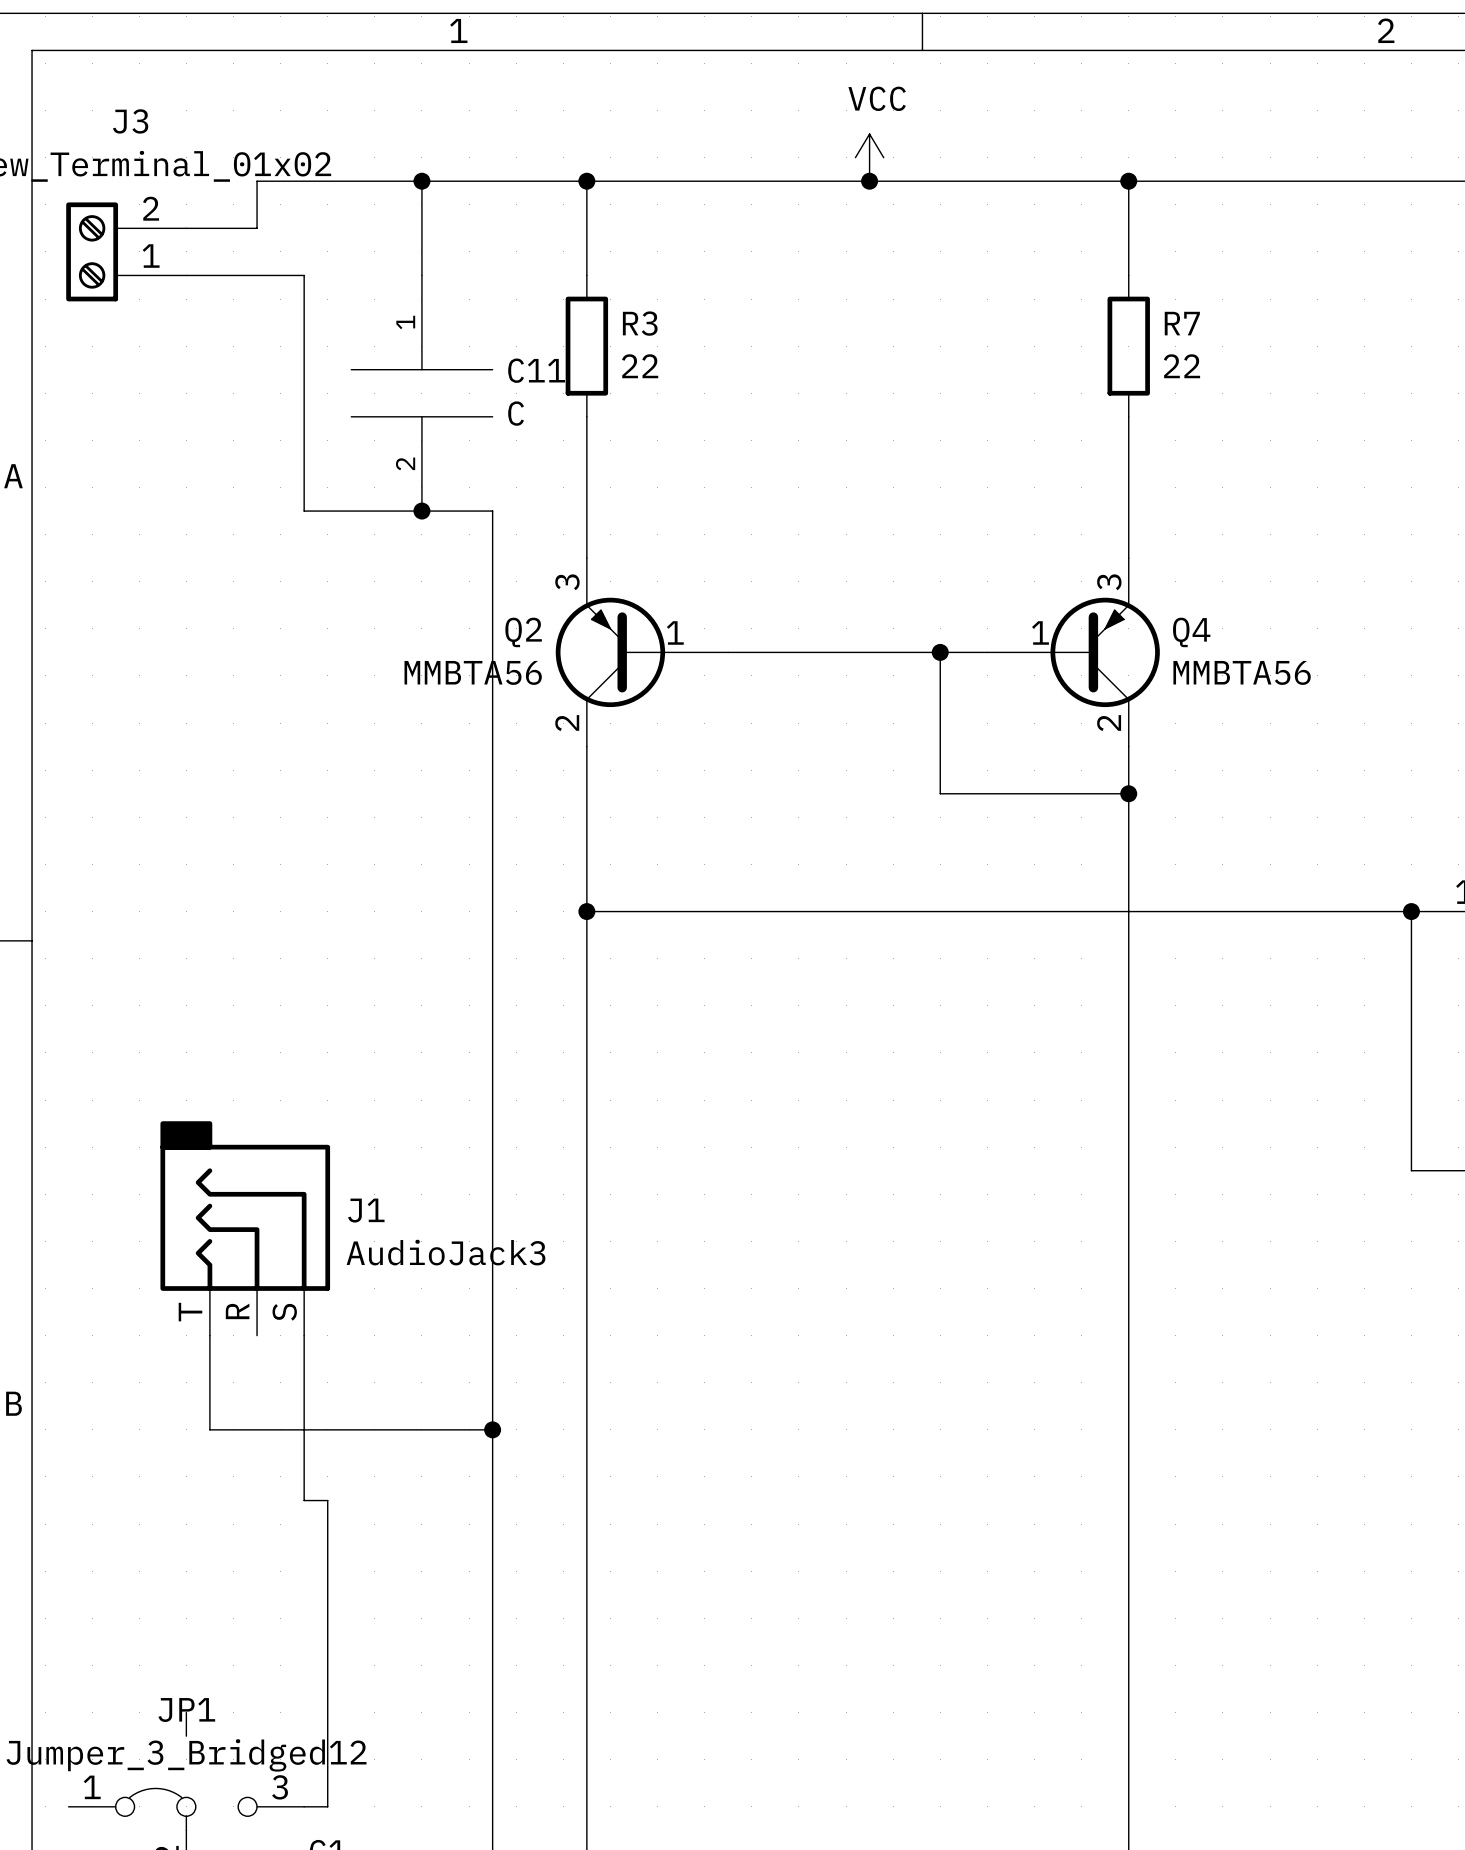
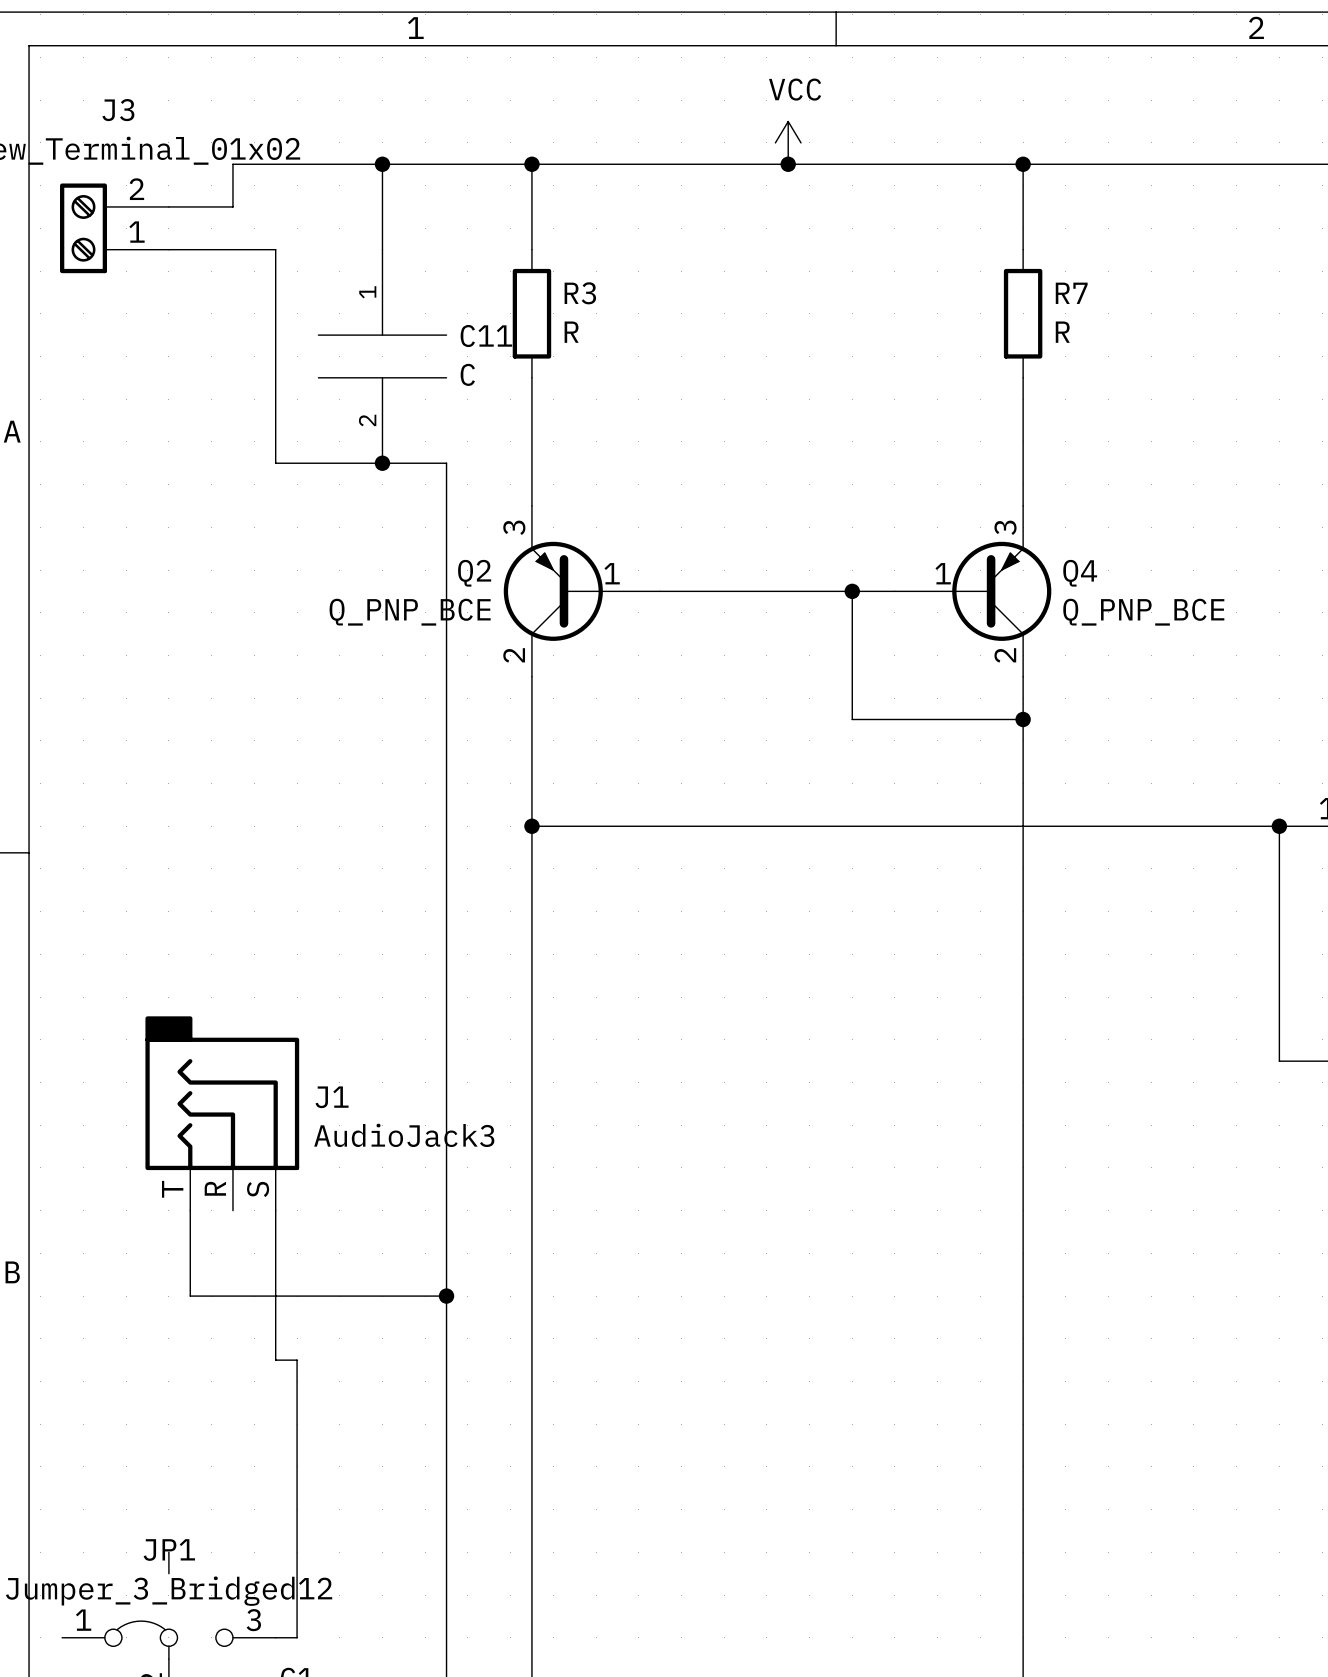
R3 value: 22 (640, 366) -> R (571, 332)
R7 value: 22 (1182, 366) -> R (1062, 332)
Q2 value: MMBTA56 (473, 672) -> Q_PNP_BCE (410, 612)
Q4 value: MMBTA56 (1242, 672) -> Q_PNP_BCE (1143, 612)

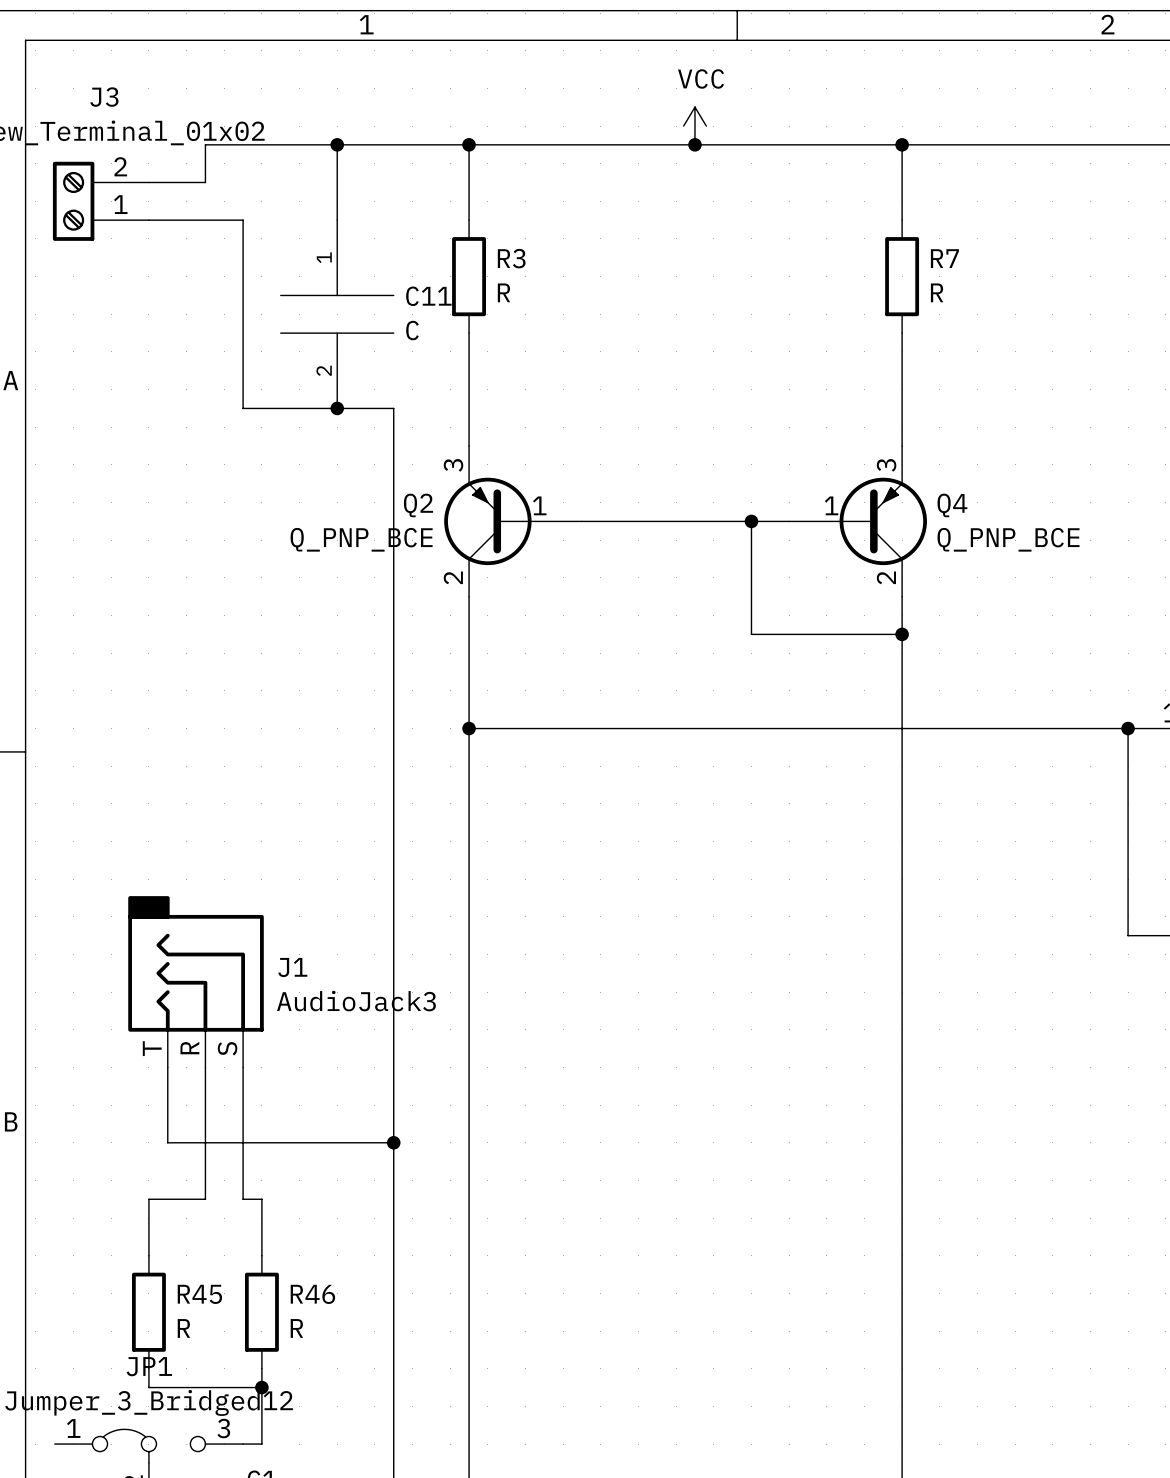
wire: none -> (205, 1067) (205, 1199) (148, 1199) (148, 1255)
wire: (297, 1424) (297, 1552) -> none
R45: none -> R (148, 1312)
R46: none -> R (261, 1312)
wire: none -> (148, 1387) (261, 1387)
junction: none -> (261, 1387)

